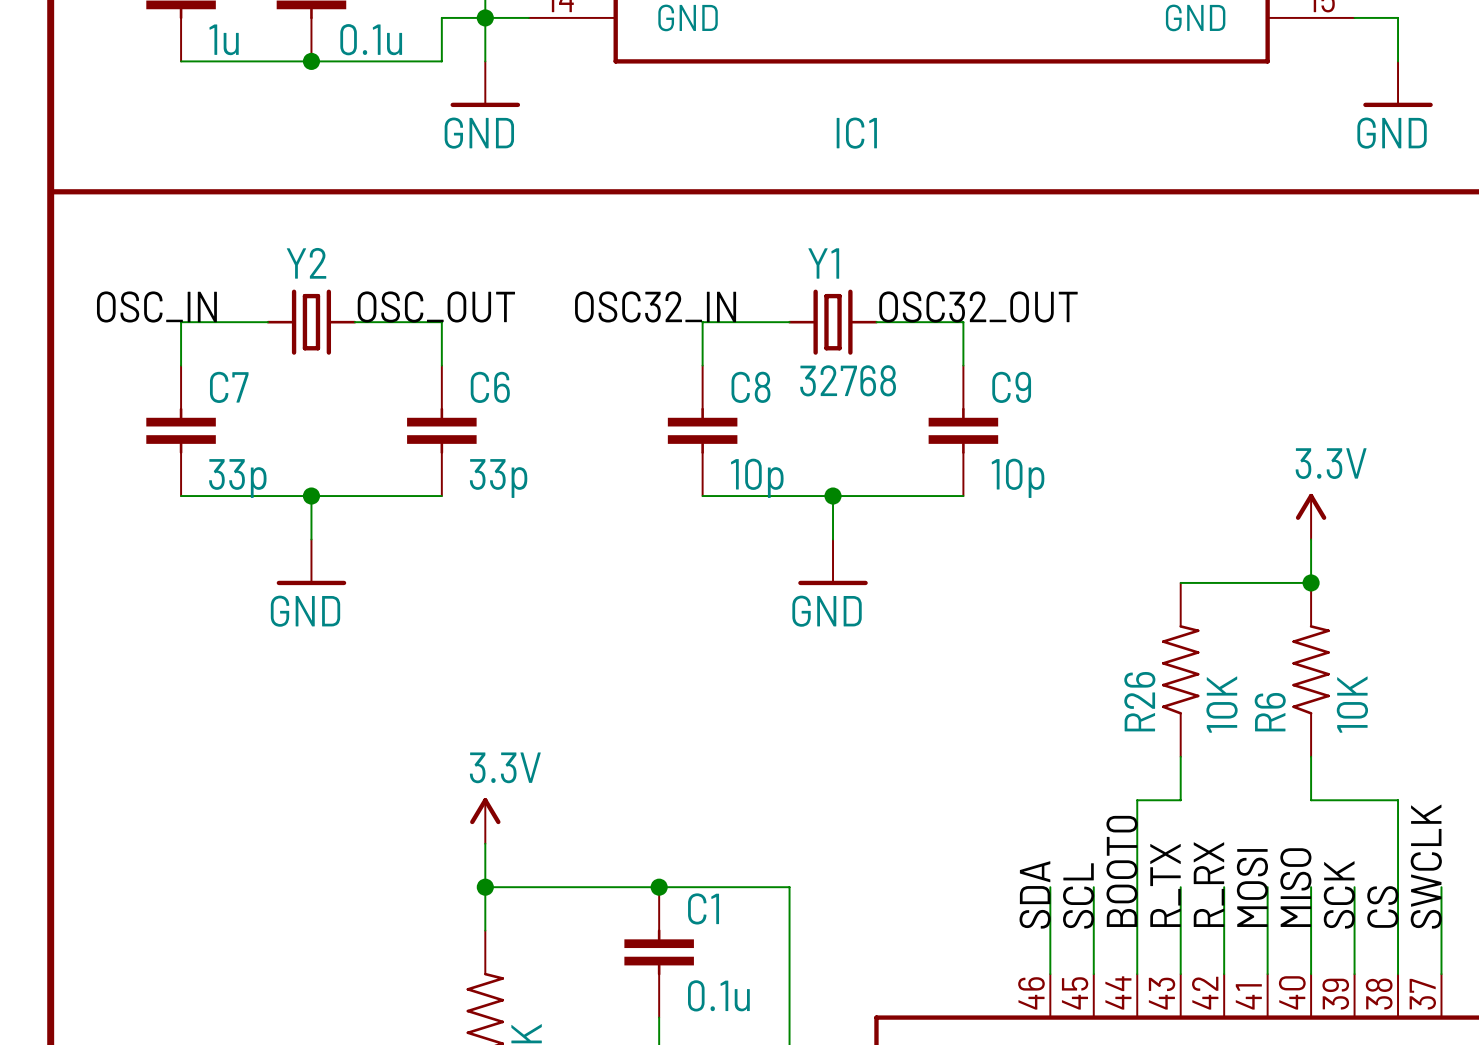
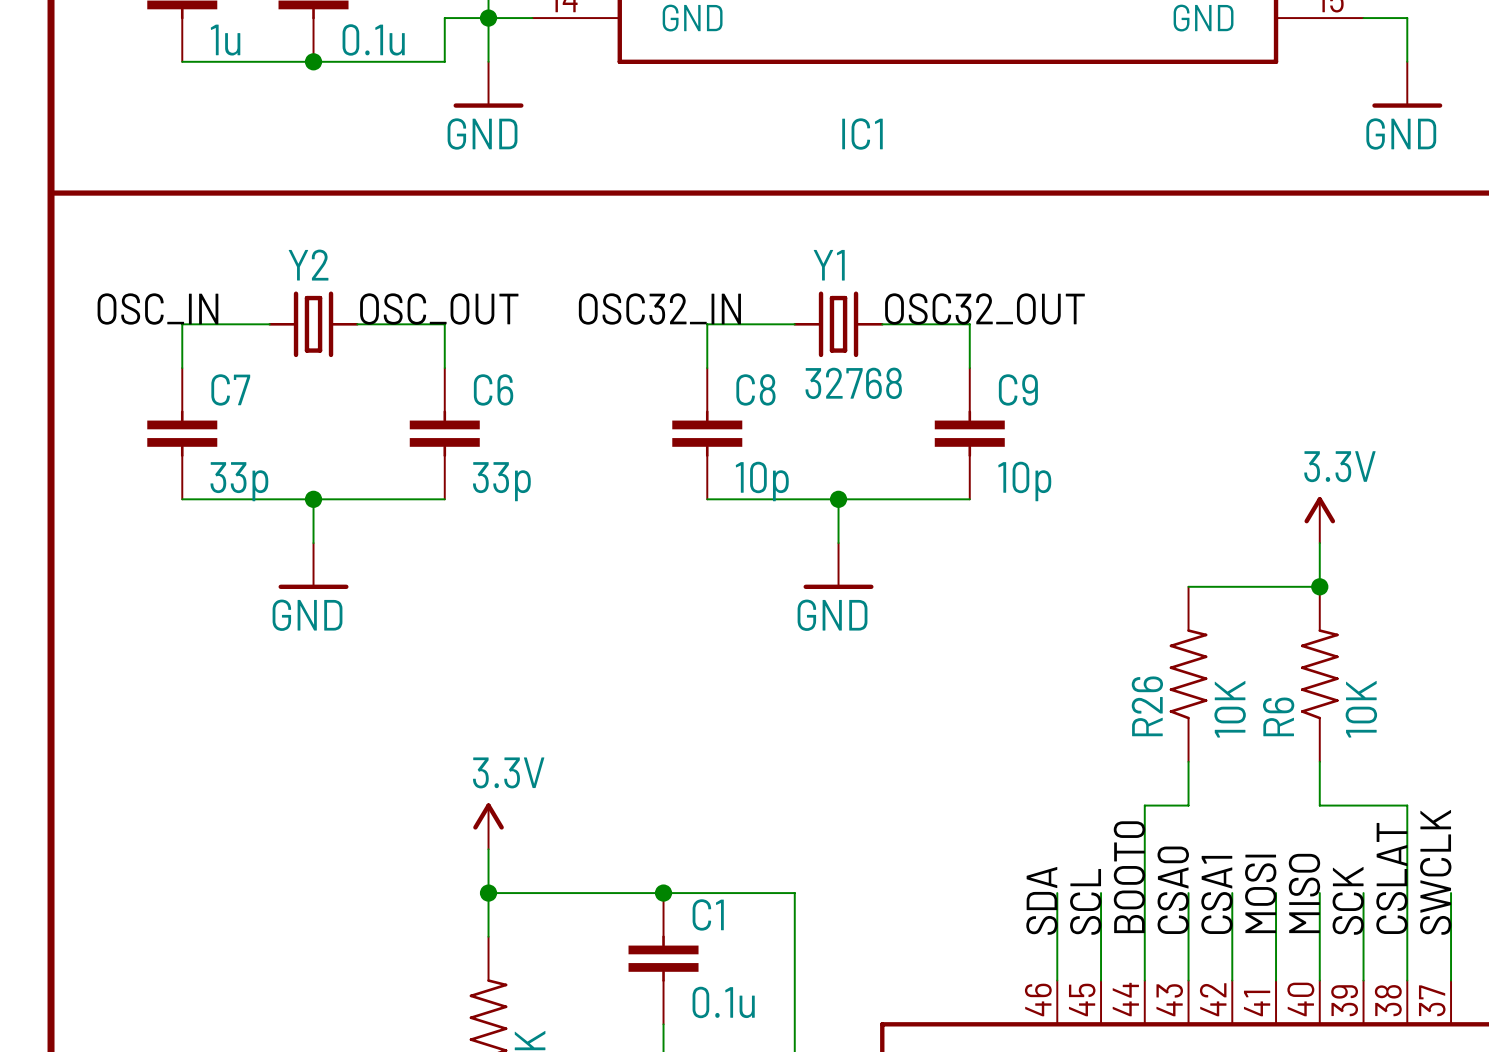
label: R_RX (1208, 884) -> CSA1 (1216, 894)
label: R_TX (1165, 885) -> CSA0 (1173, 890)
label: CS (1382, 907) -> CSLAT (1391, 878)

